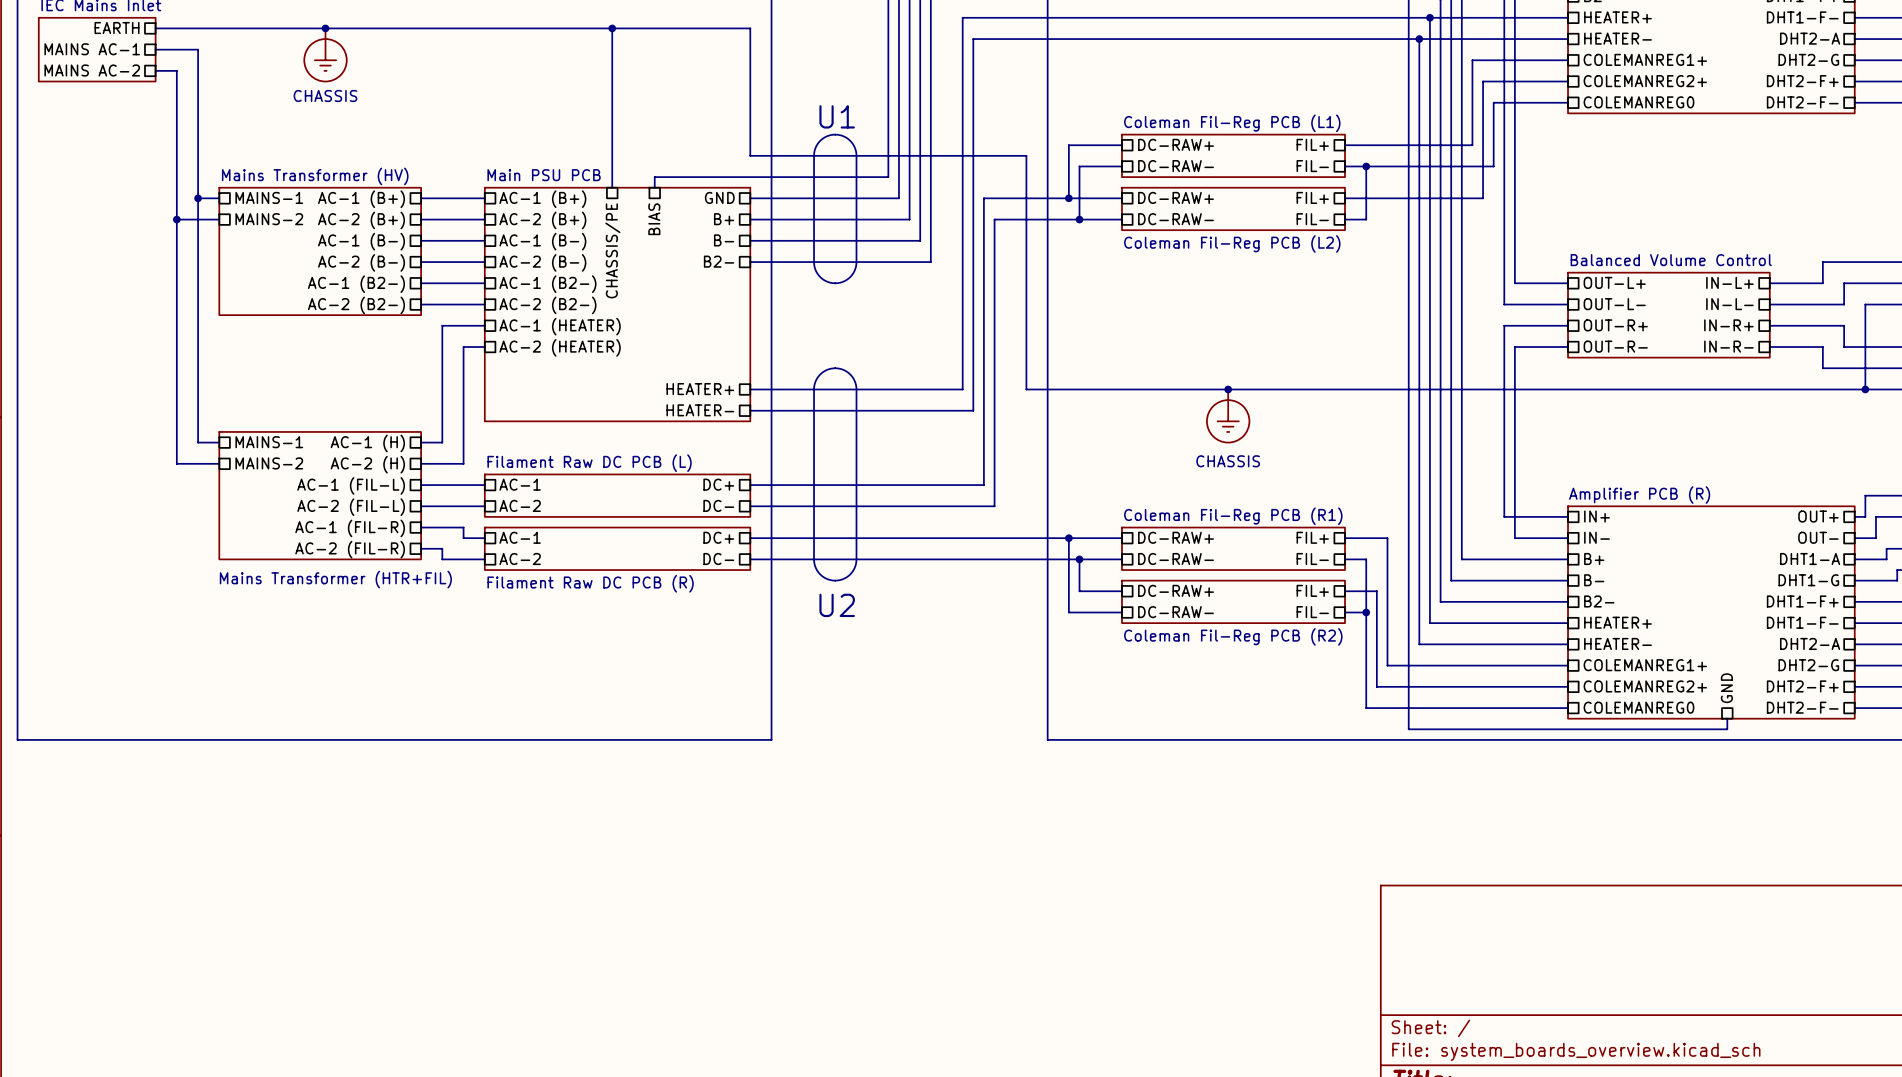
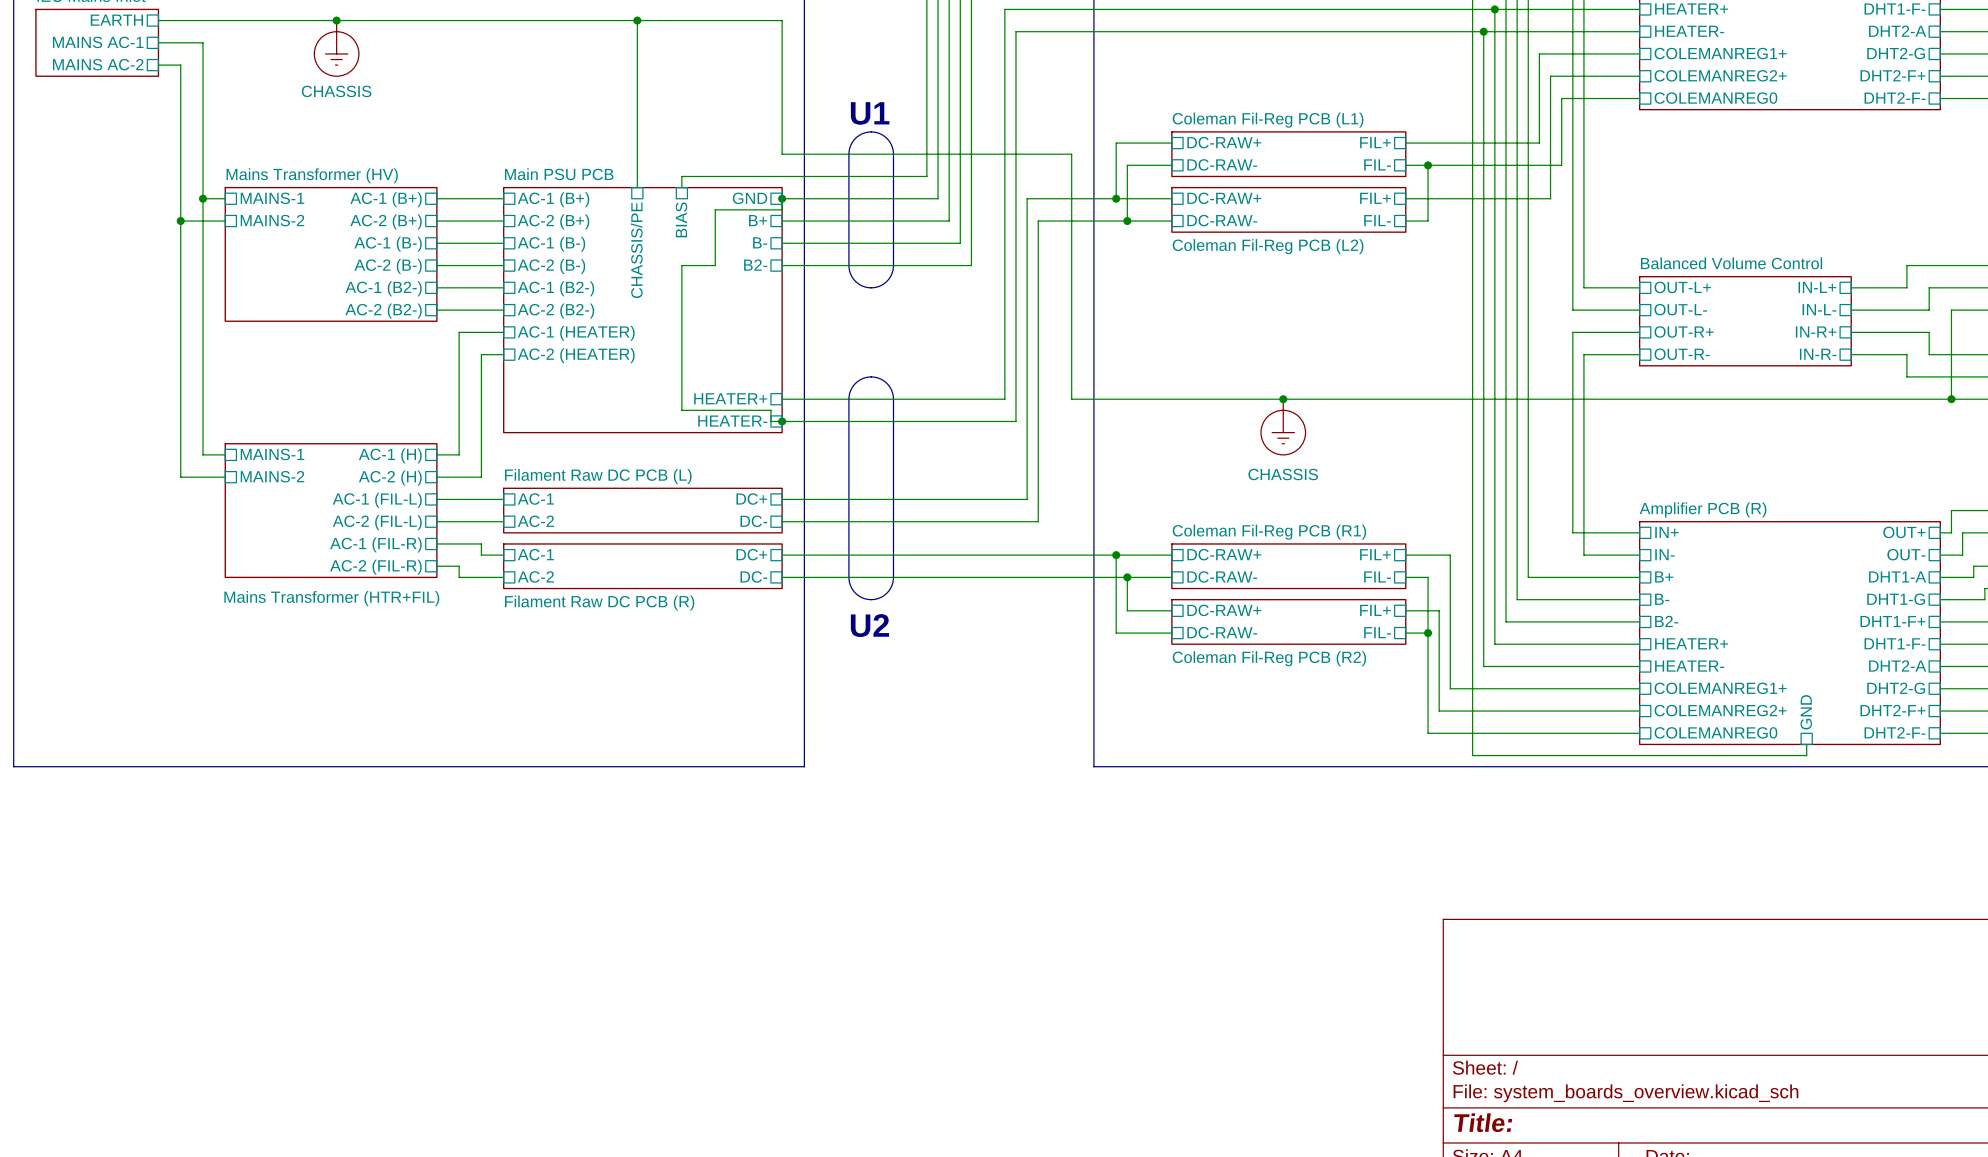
wire: none -> (782, 198) (782, 209) (715, 209) (715, 265) (681, 265) (681, 410) (770, 410) (770, 421) (782, 421)
junction: none -> (782, 198)
junction: none -> (782, 421)

